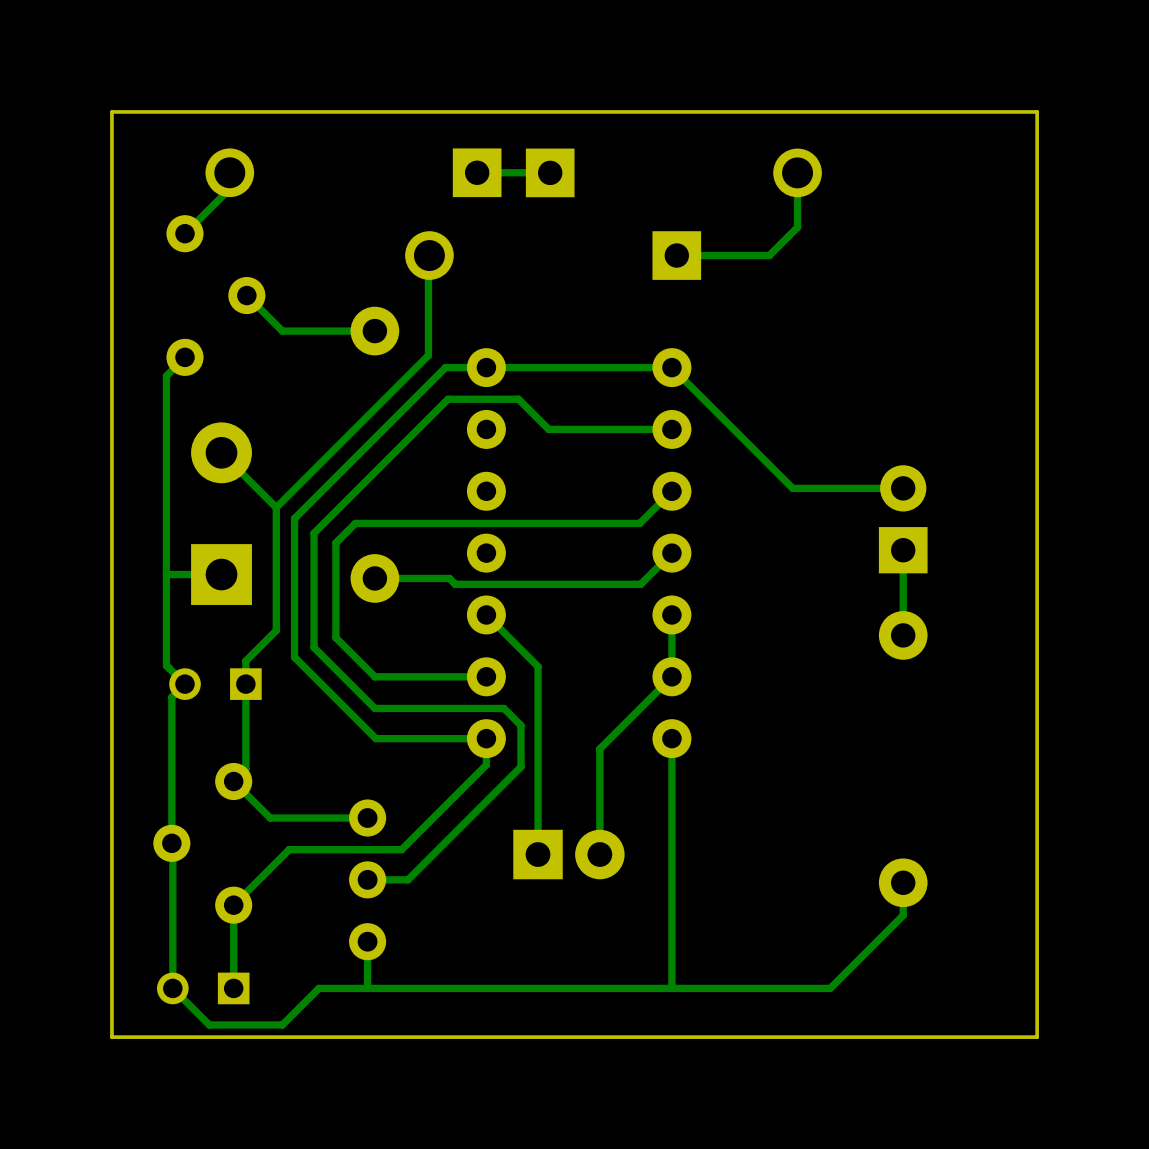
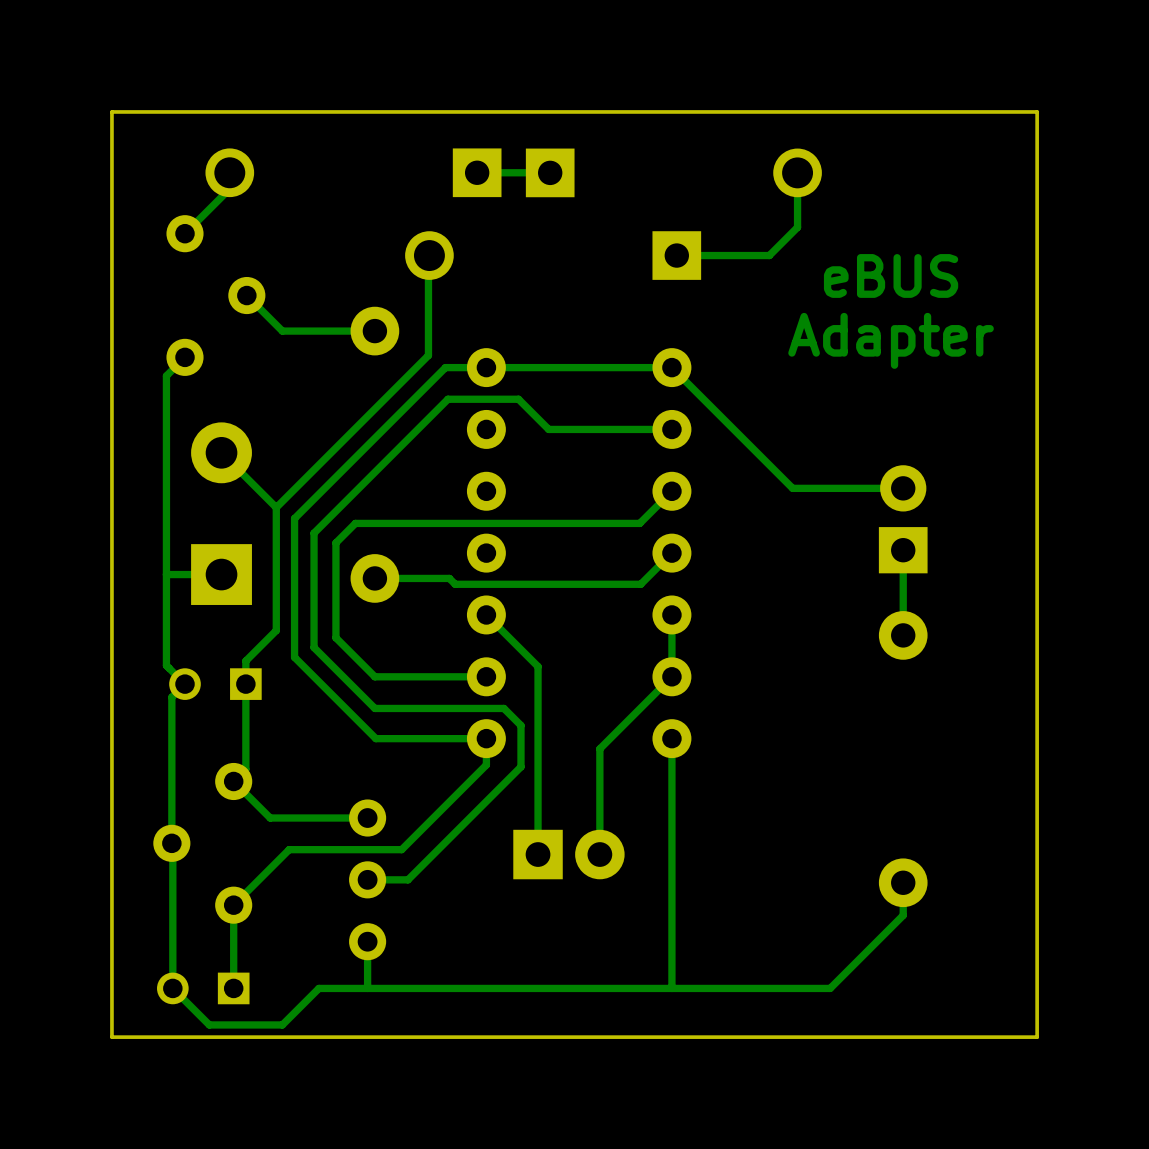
text: none -> eBUS (891, 275)
text: none -> Adapter (891, 340)

